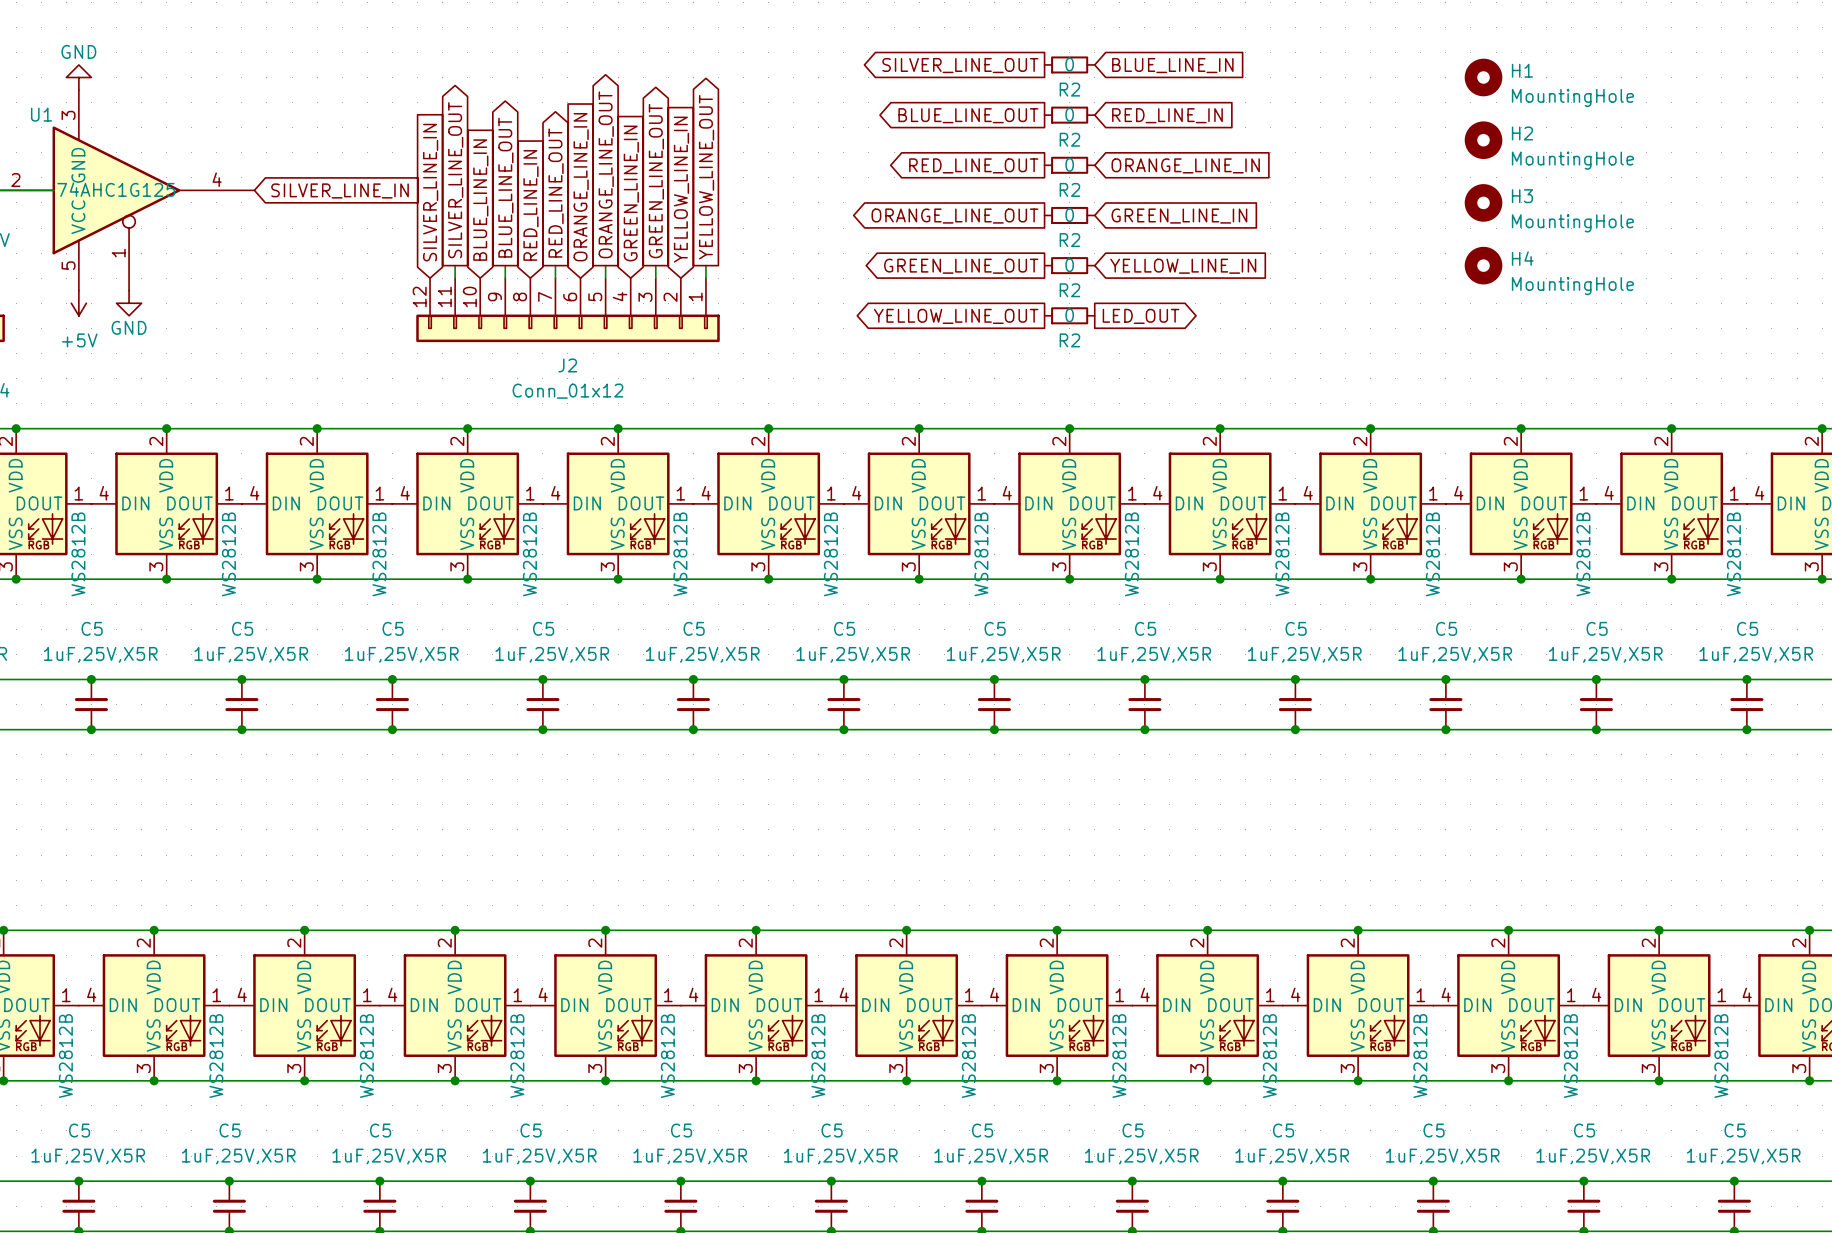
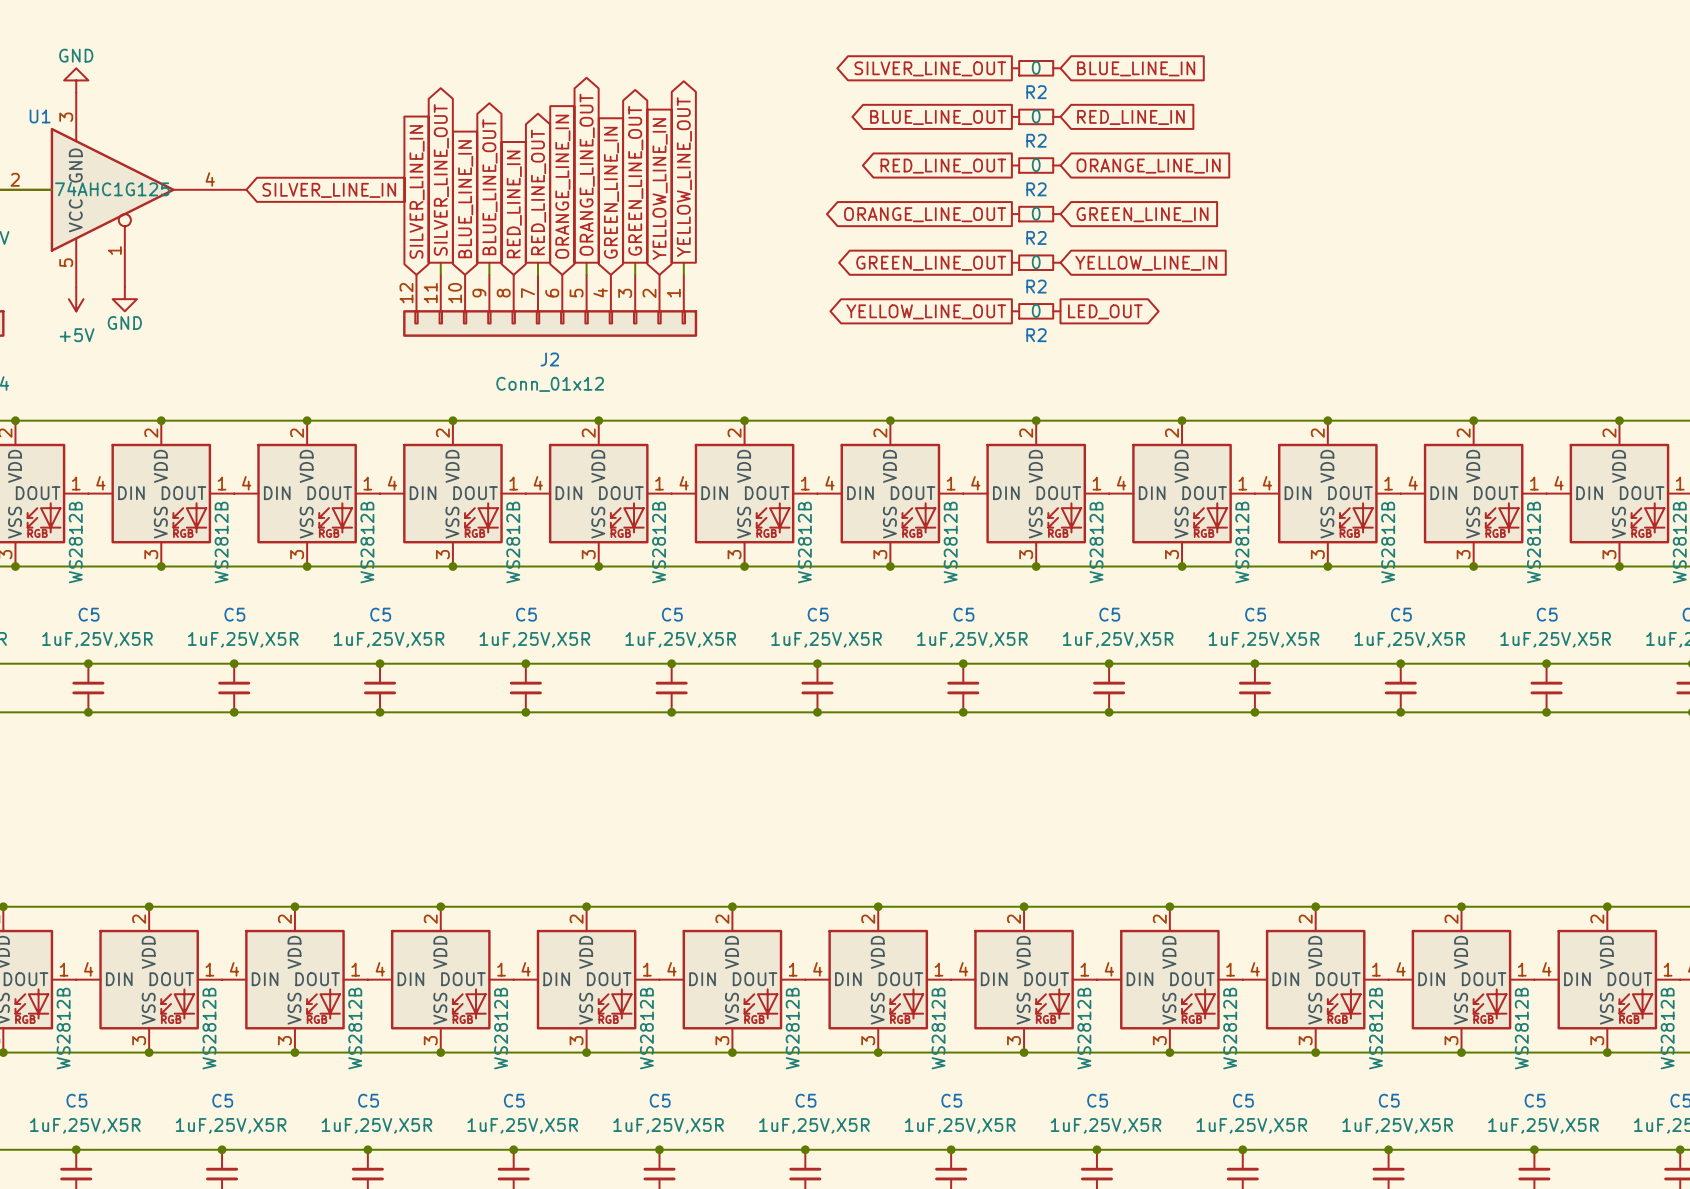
H1: MountingHole (1483, 77) -> none
H2: MountingHole (1483, 140) -> none
H3: MountingHole (1483, 202) -> none
H4: MountingHole (1483, 265) -> none

